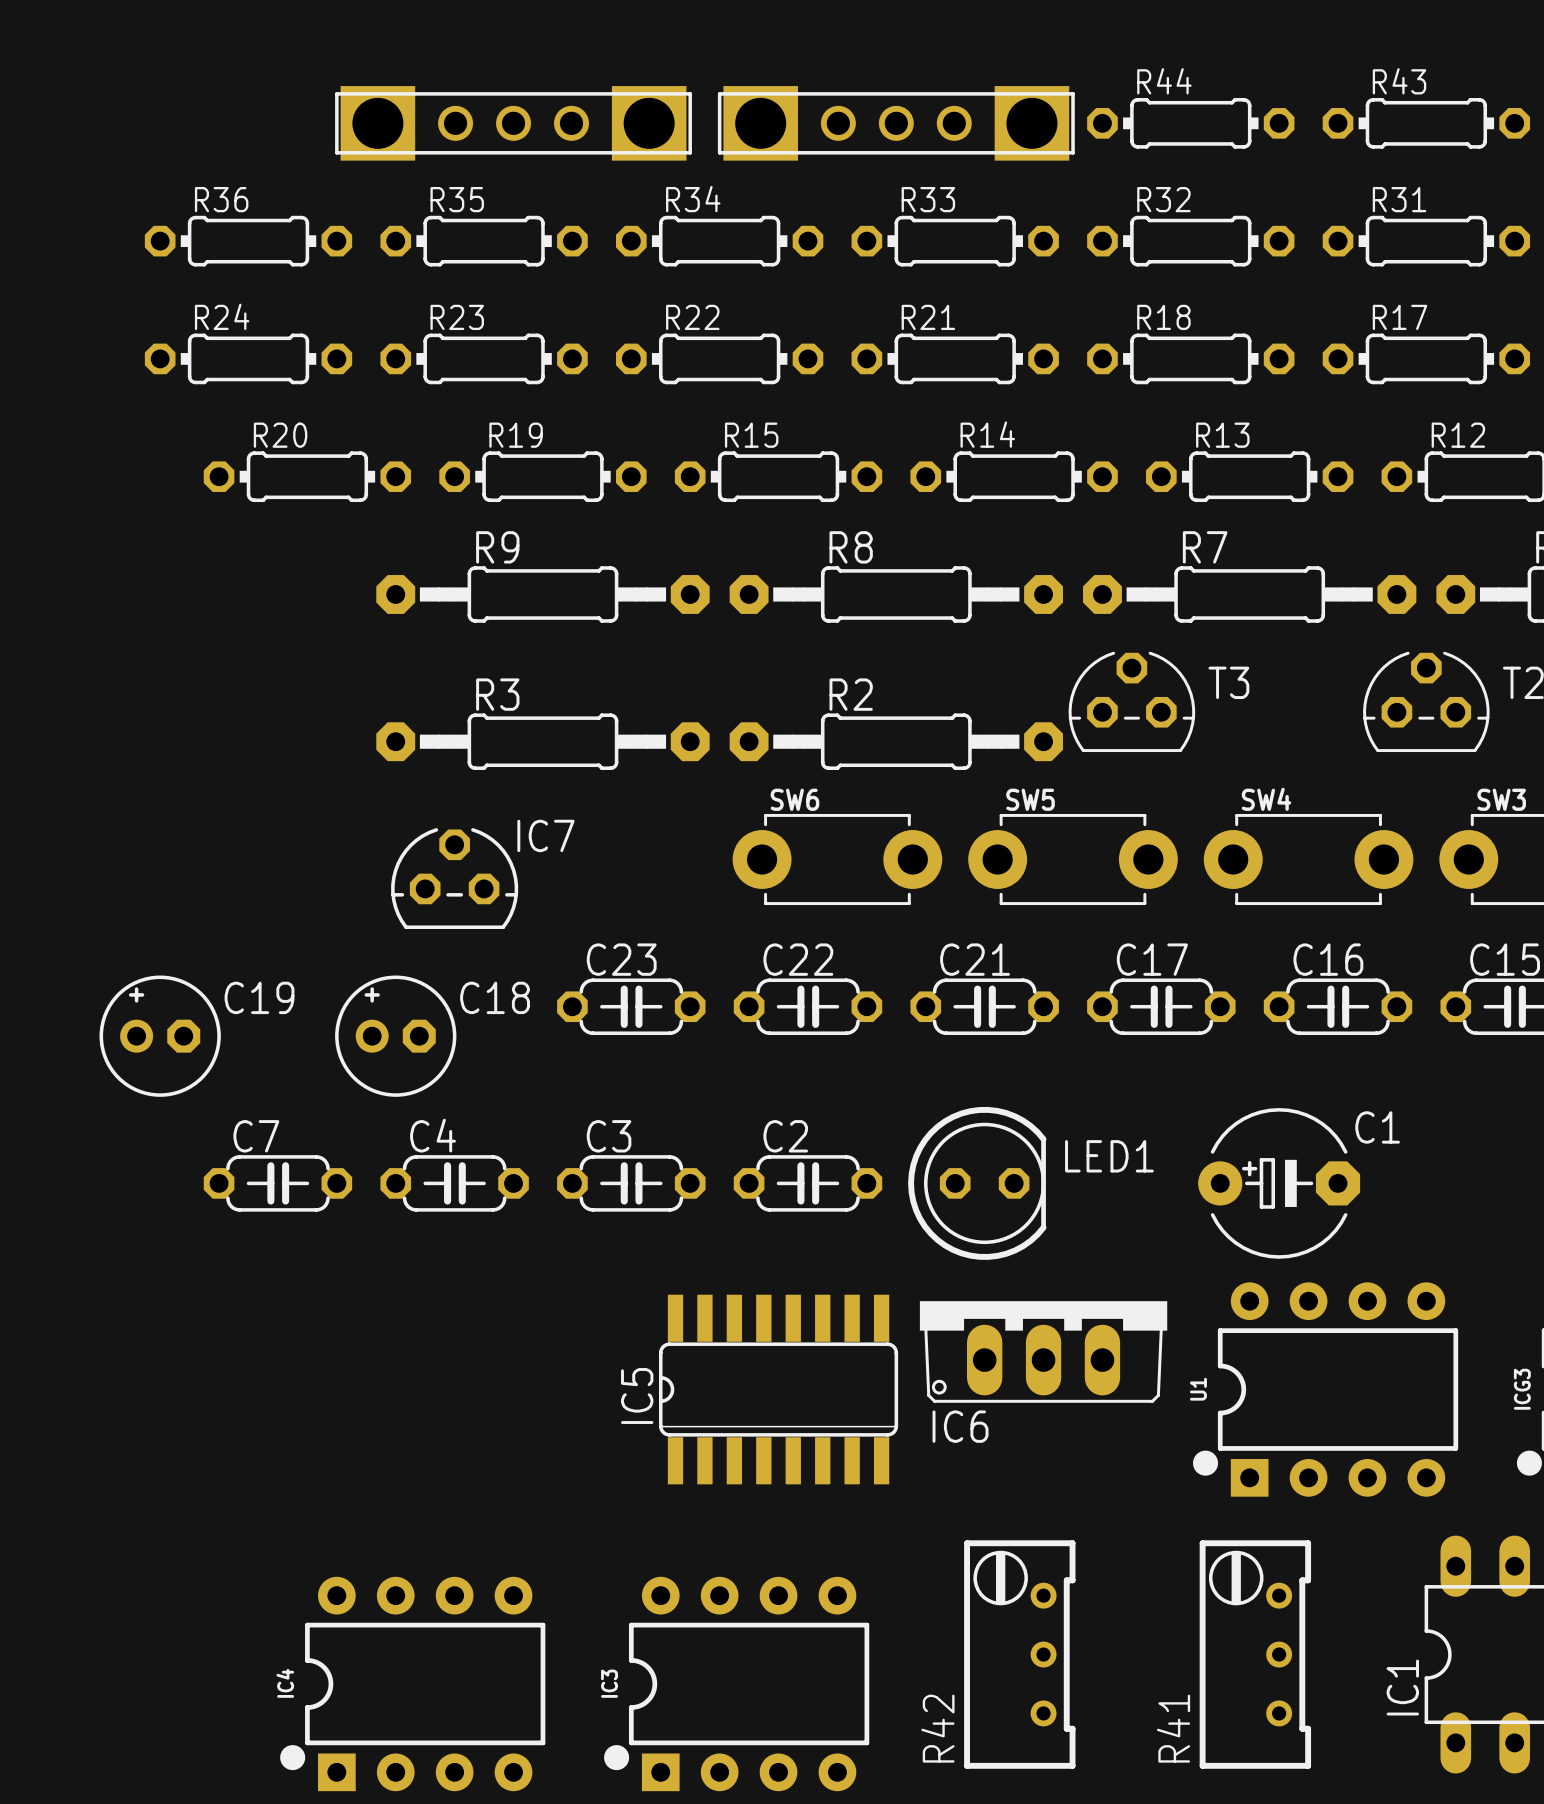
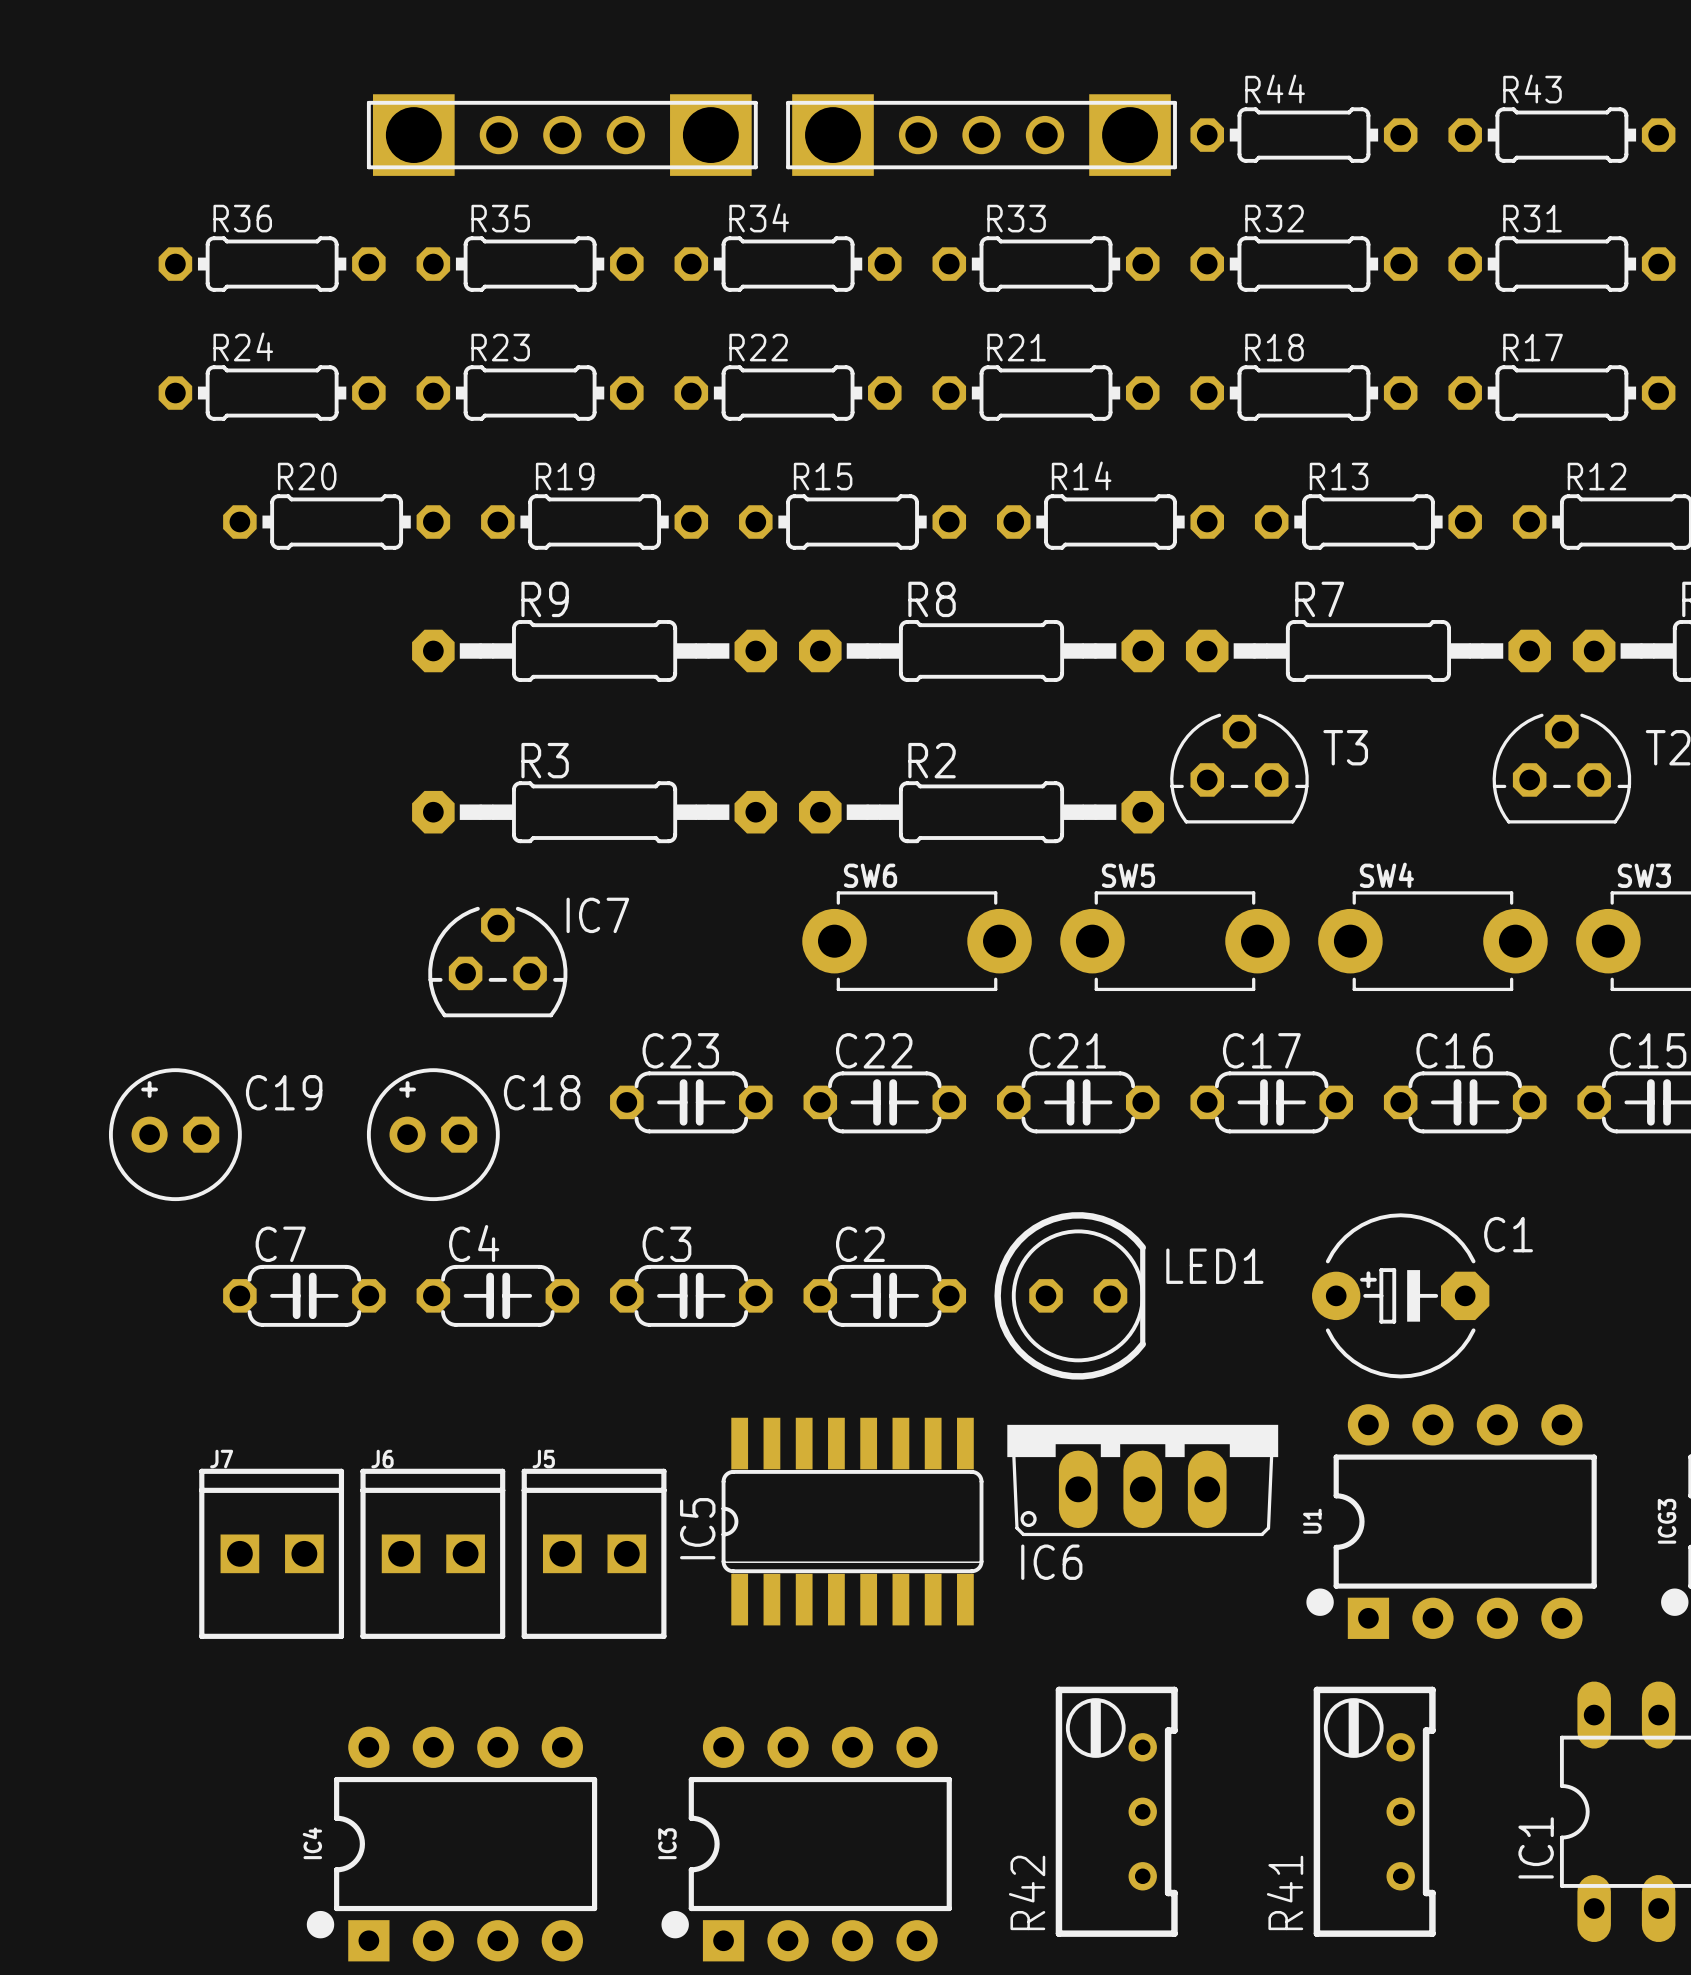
J7: none -> (271, 1553)
J6: none -> (432, 1553)
J5: none -> (594, 1553)

